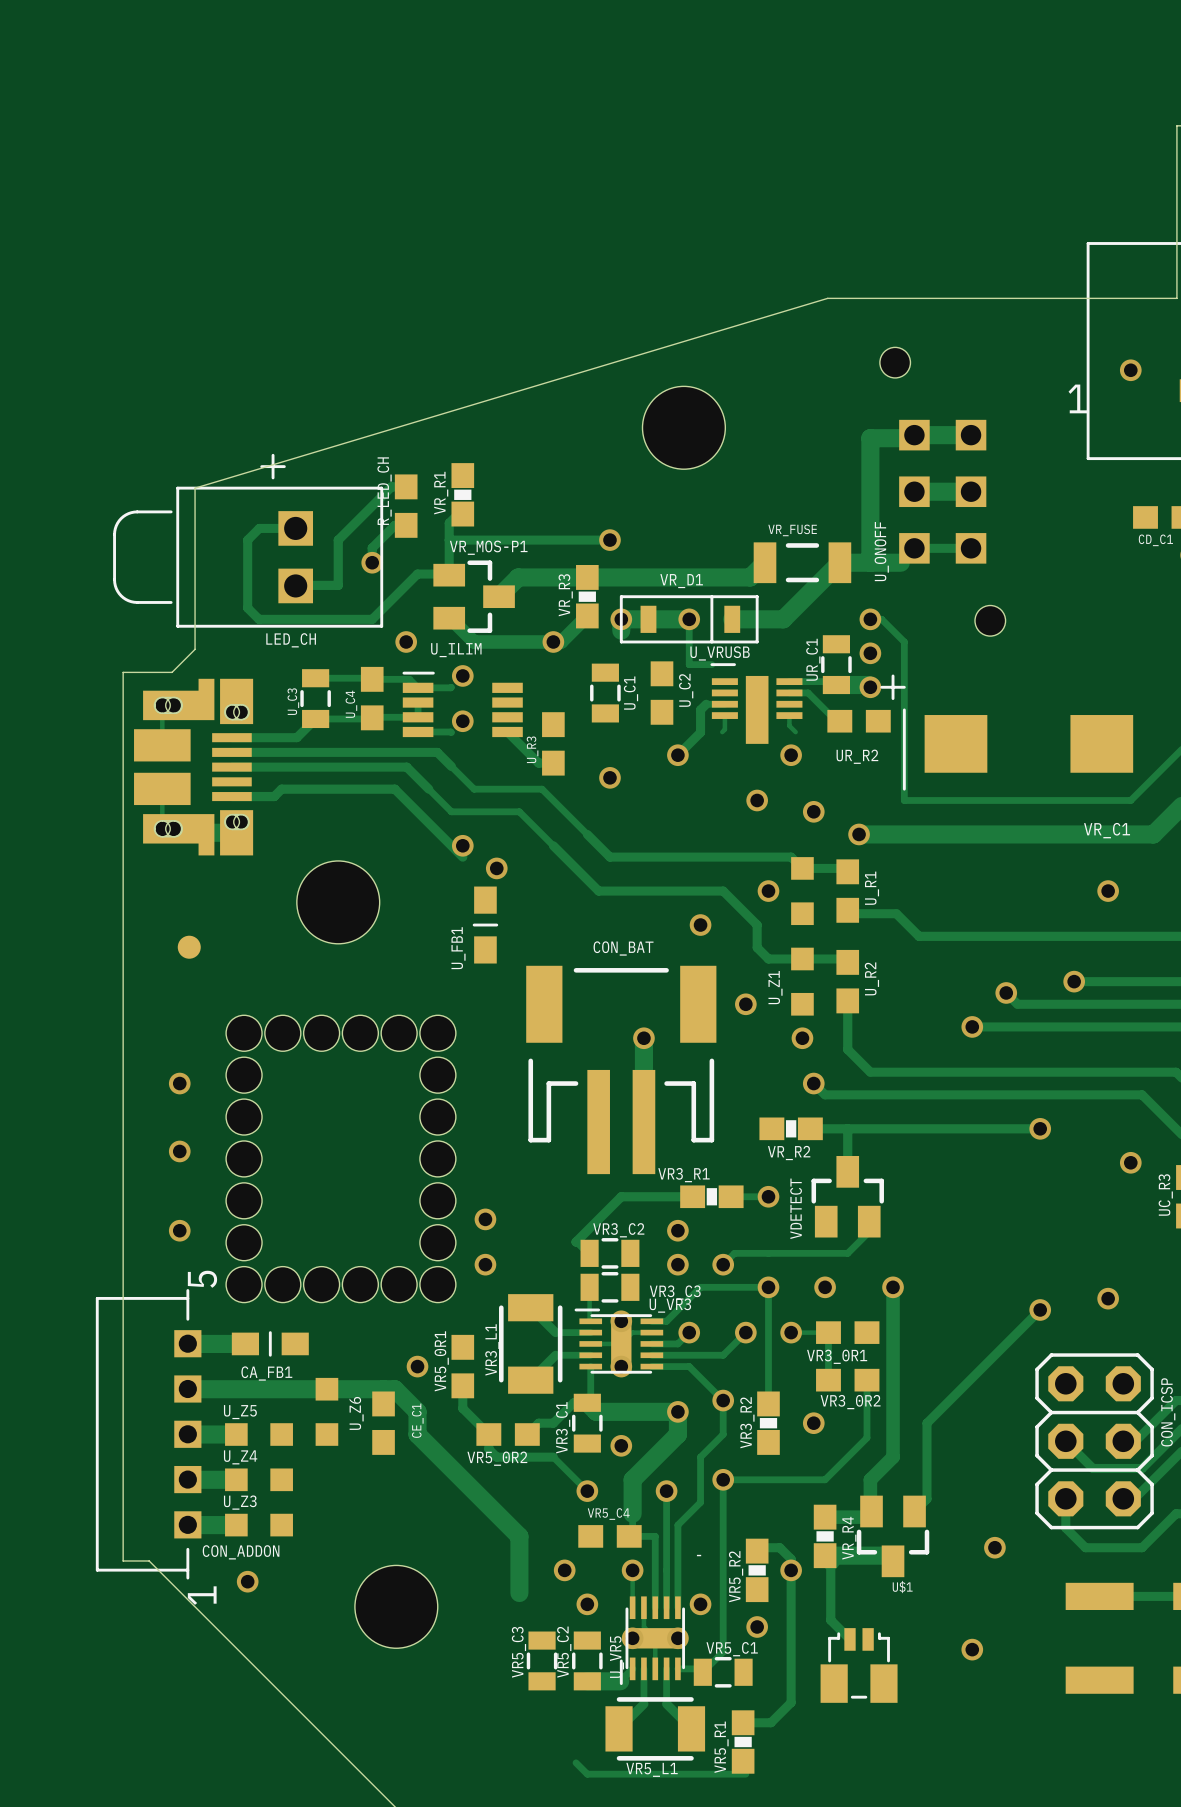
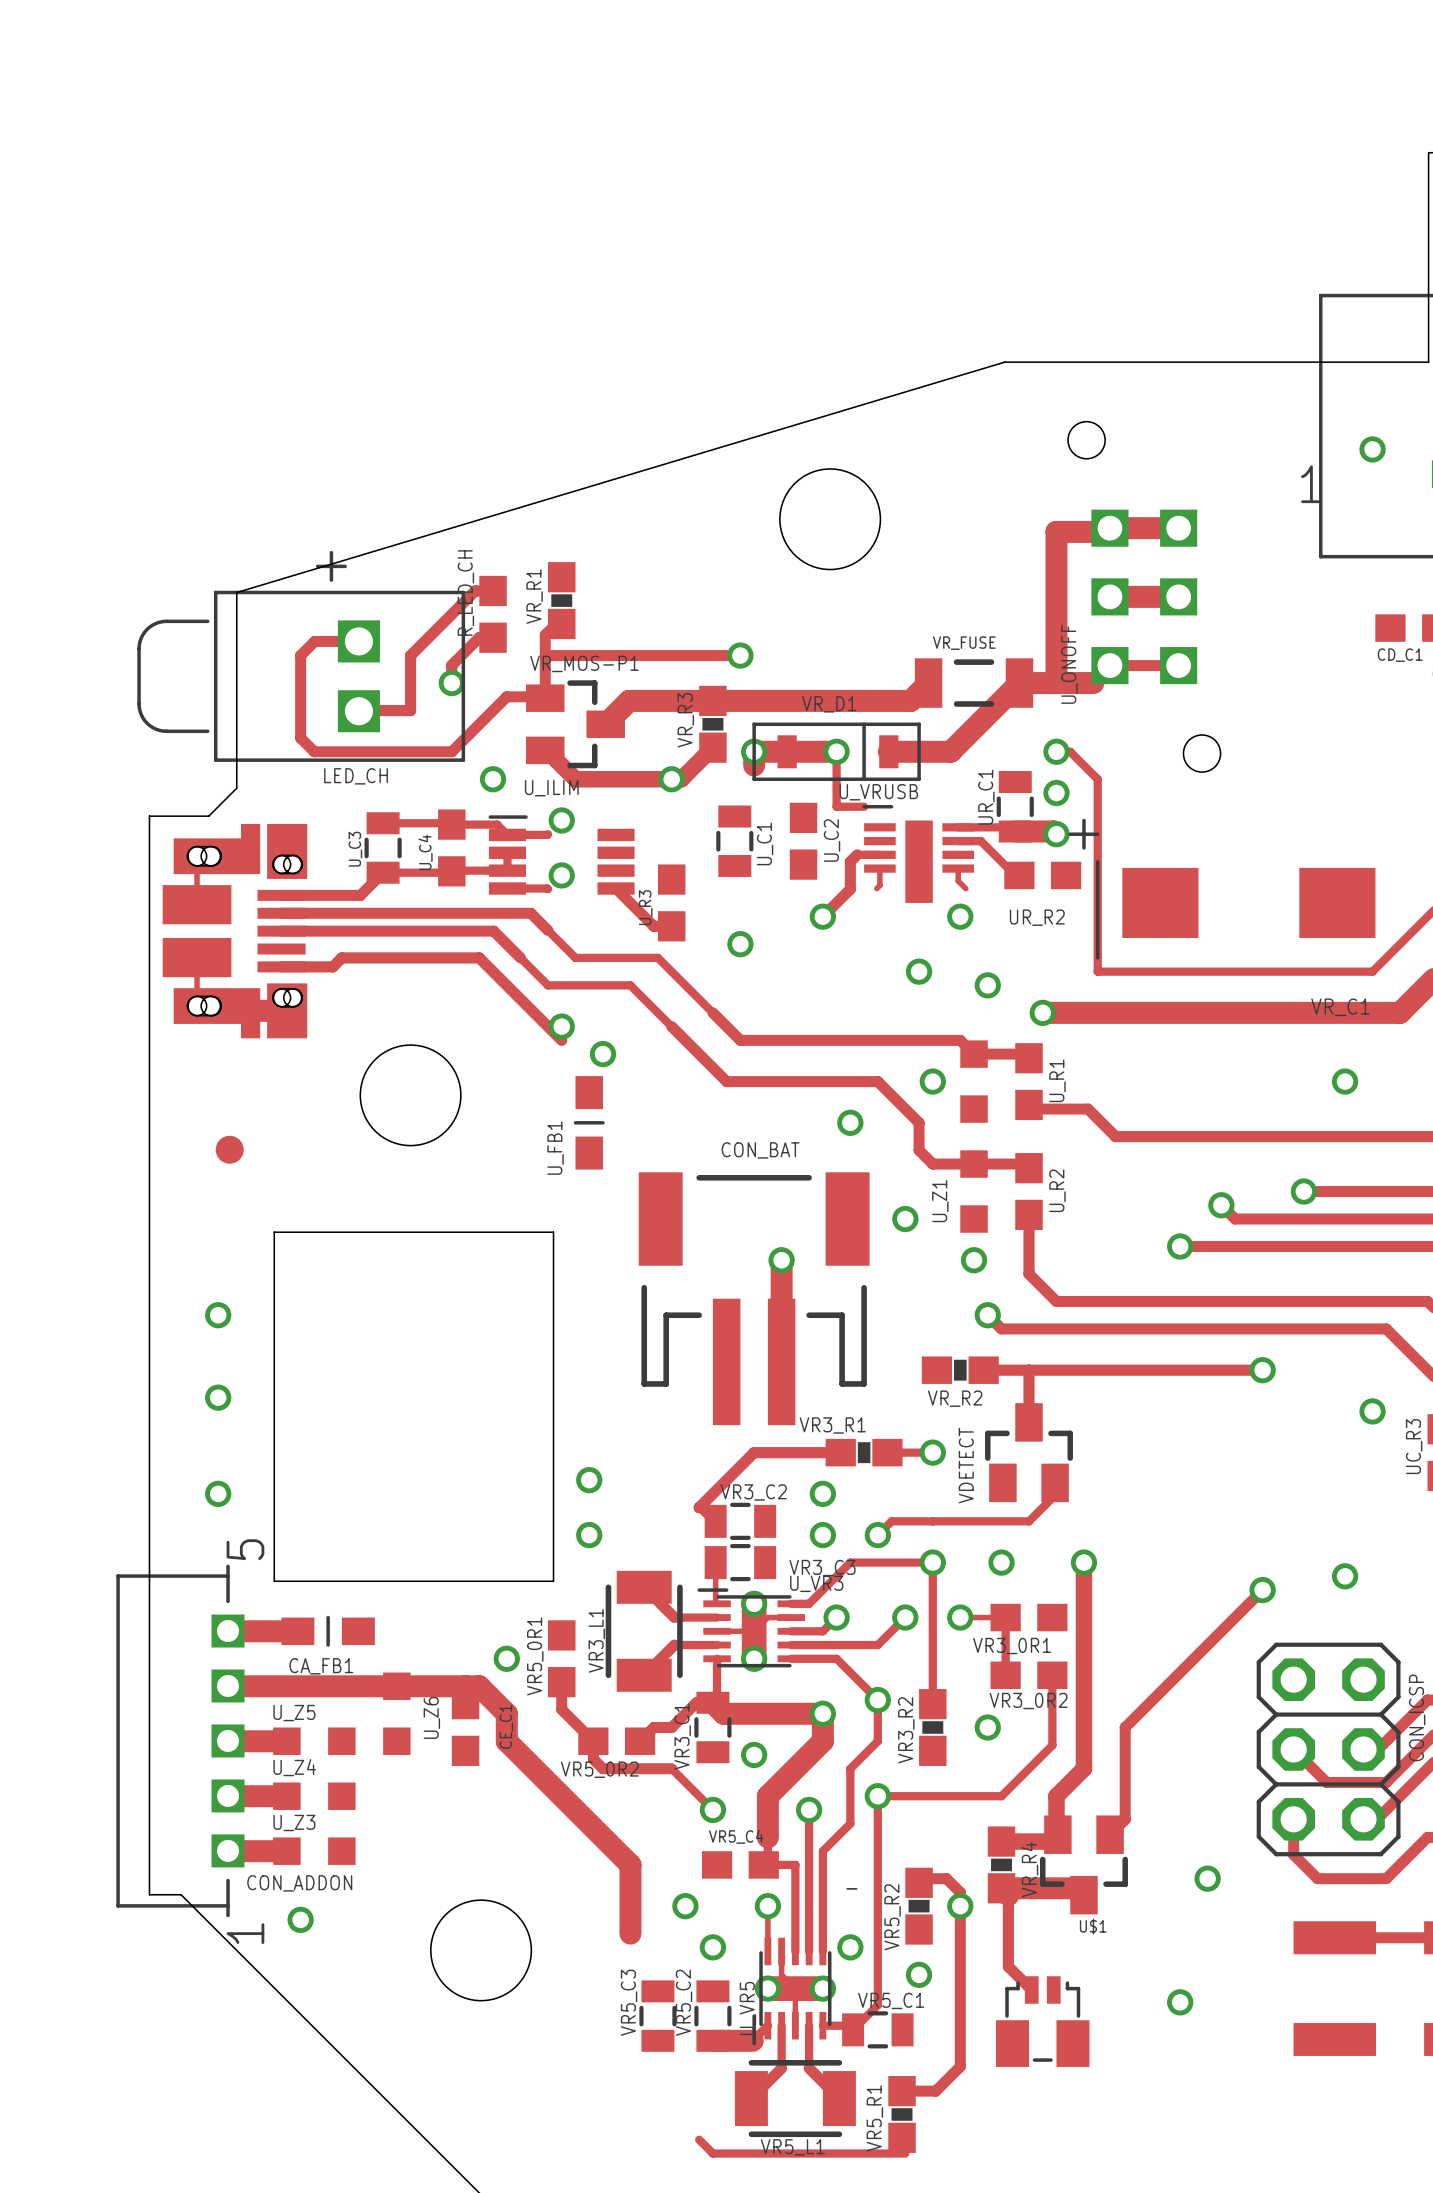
board edge: none -> (274, 1232) (274, 1581) (553, 1581) (553, 1232) (274, 1232)
hole: (244, 1033) -> none
hole: (282, 1033) -> none
hole: (321, 1033) -> none
hole: (360, 1033) -> none
hole: (399, 1033) -> none
hole: (437, 1033) -> none
hole: (244, 1075) -> none
hole: (437, 1075) -> none
hole: (244, 1117) -> none
hole: (437, 1117) -> none
hole: (244, 1158) -> none
hole: (437, 1158) -> none
hole: (244, 1200) -> none
hole: (437, 1200) -> none
hole: (244, 1242) -> none
hole: (437, 1242) -> none
hole: (244, 1284) -> none
hole: (282, 1284) -> none
hole: (321, 1284) -> none
hole: (360, 1284) -> none
hole: (399, 1284) -> none
hole: (437, 1284) -> none

